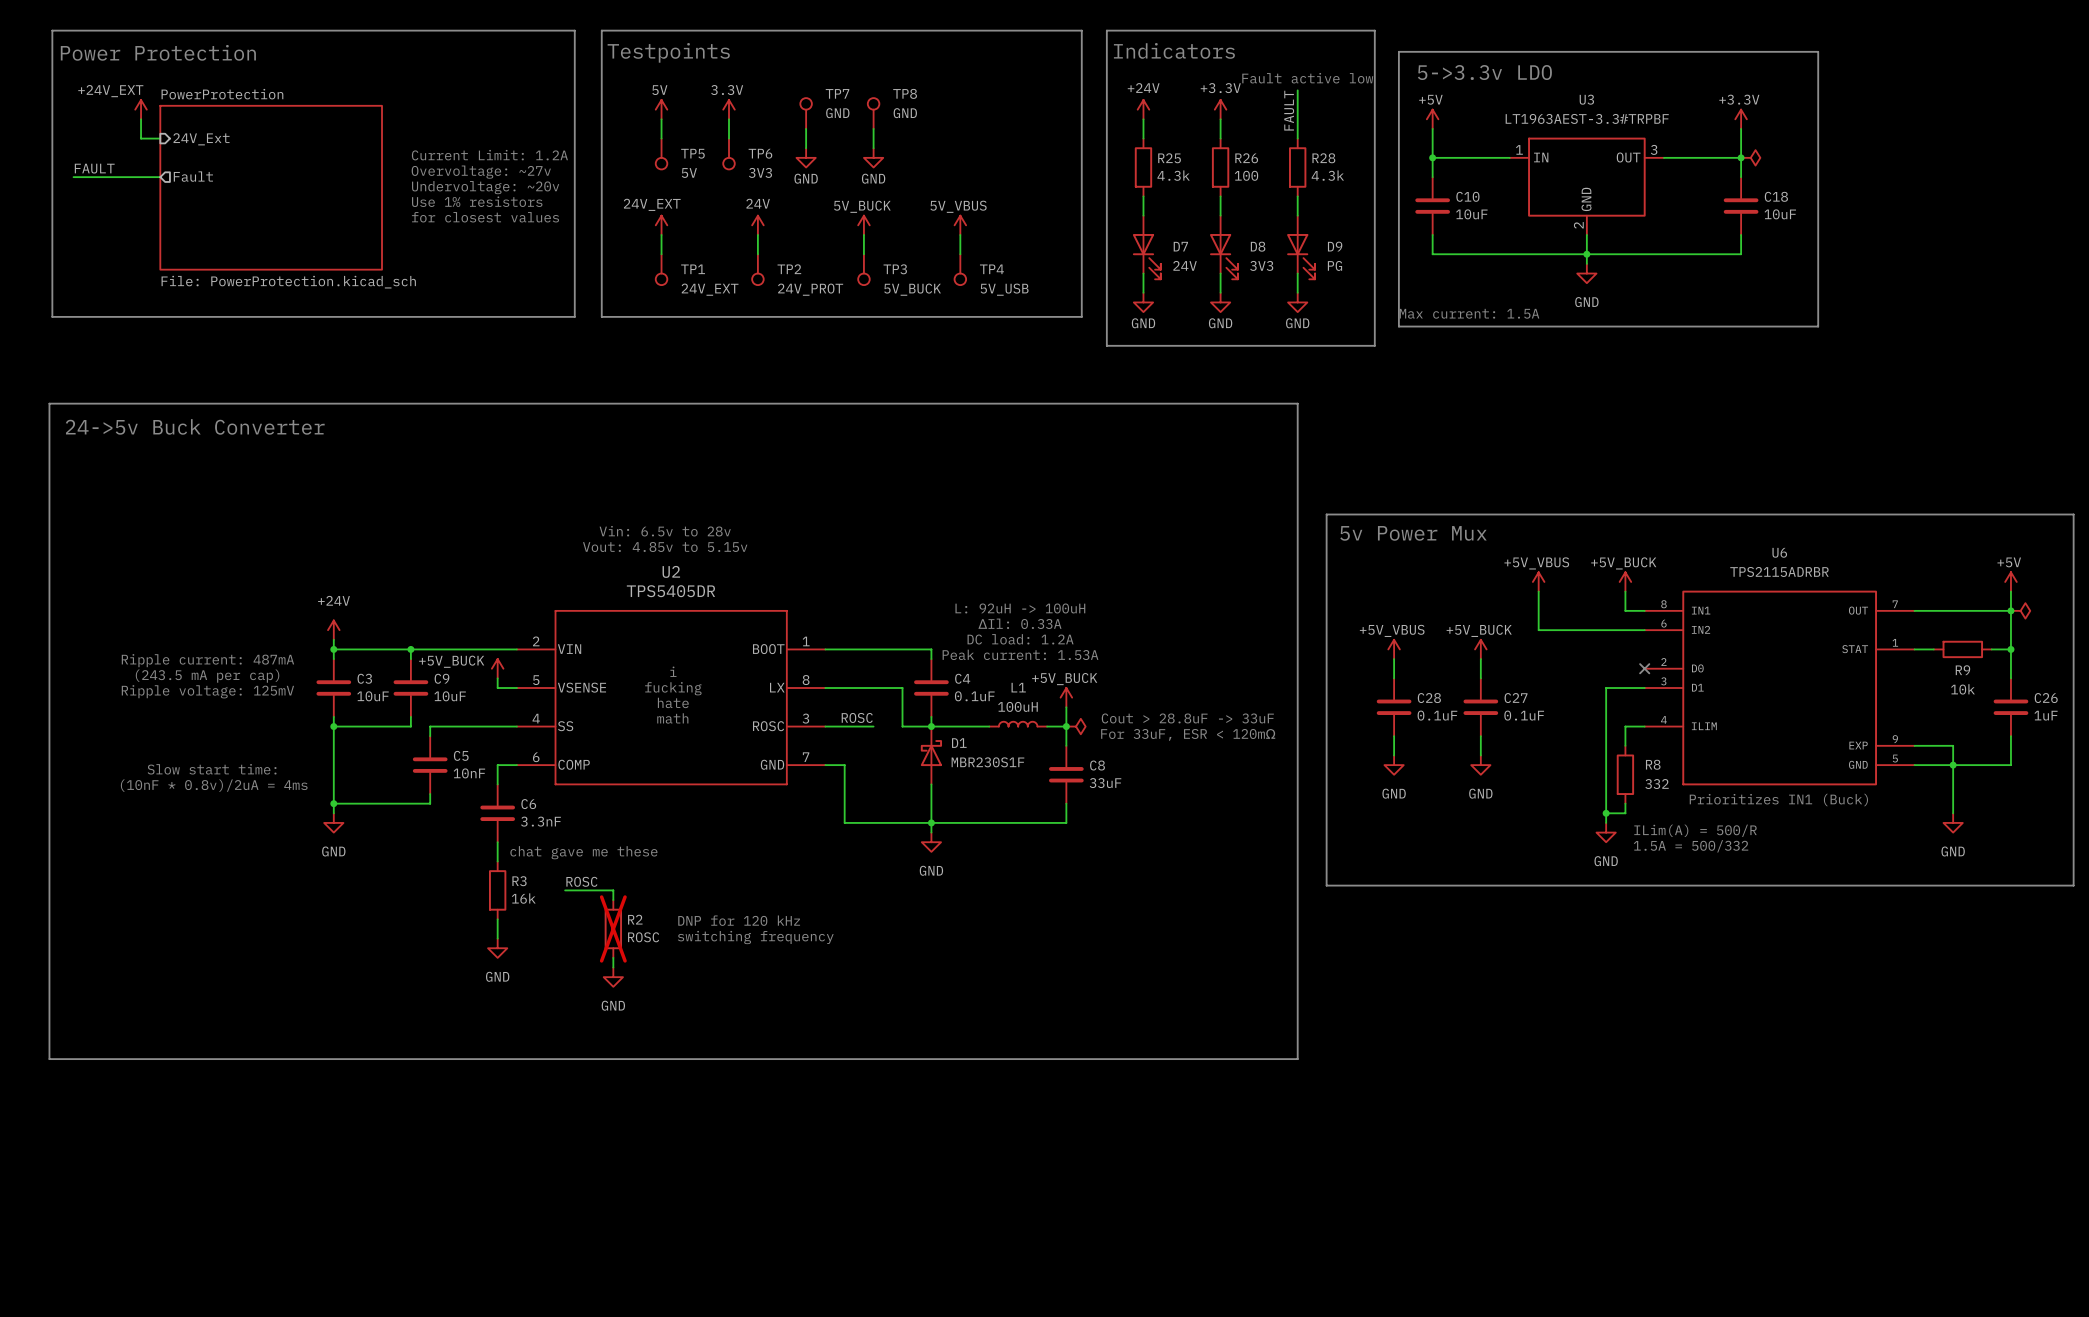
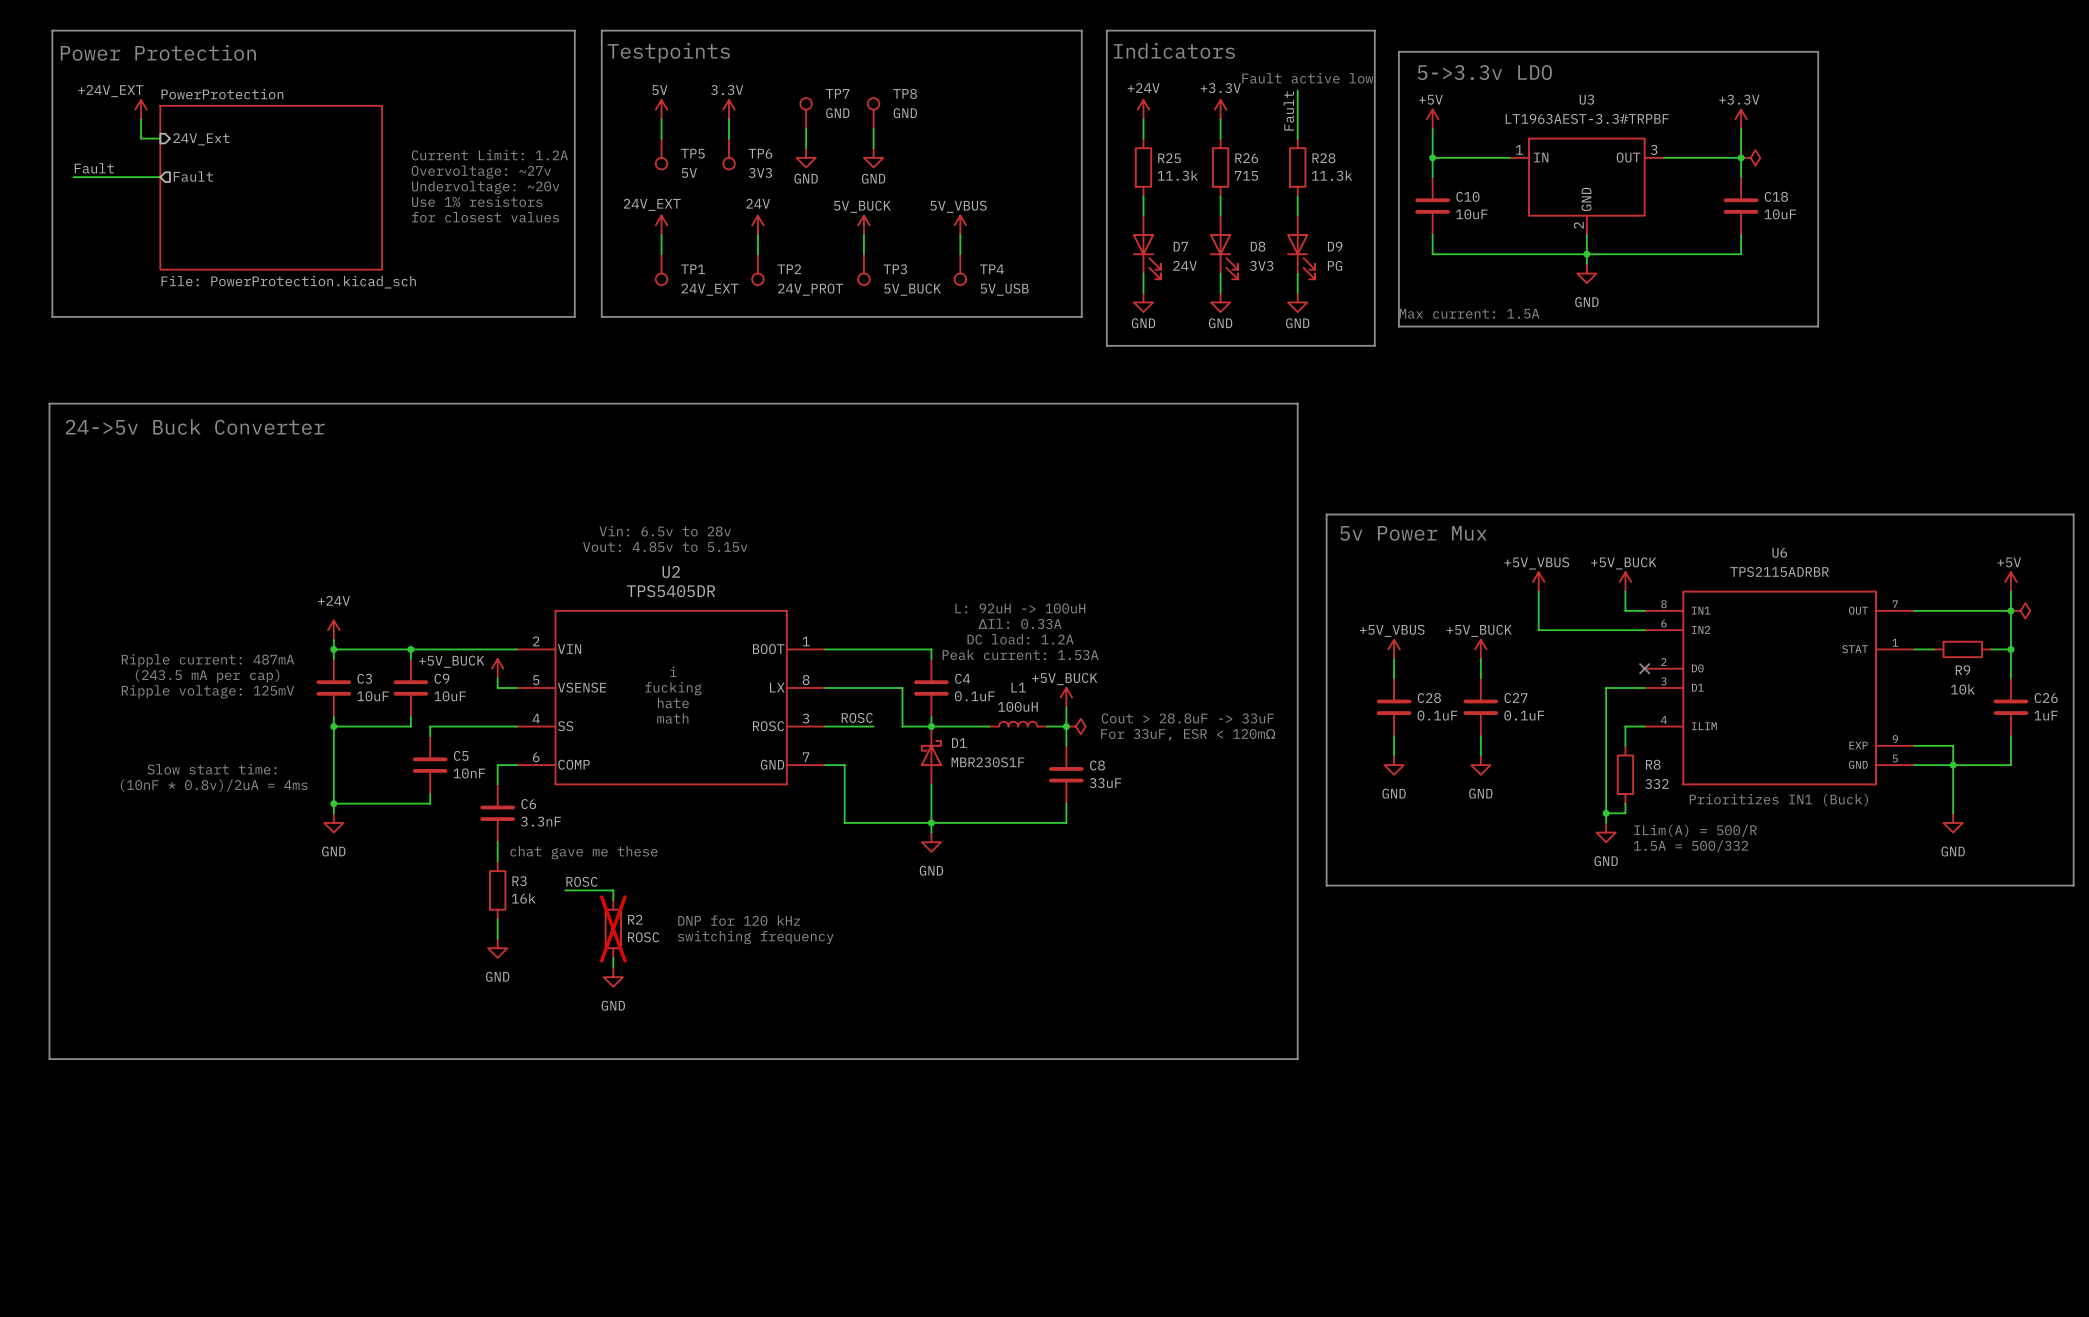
label: FAULT (1289, 110) -> Fault (1288, 110)
label: FAULT (94, 168) -> Fault (94, 168)
R25 value: 4.3k (1173, 175) -> 11.3k (1177, 175)
R26 value: 100 (1246, 175) -> 715 (1246, 175)
R28 value: 4.3k (1327, 175) -> 11.3k (1332, 175)

